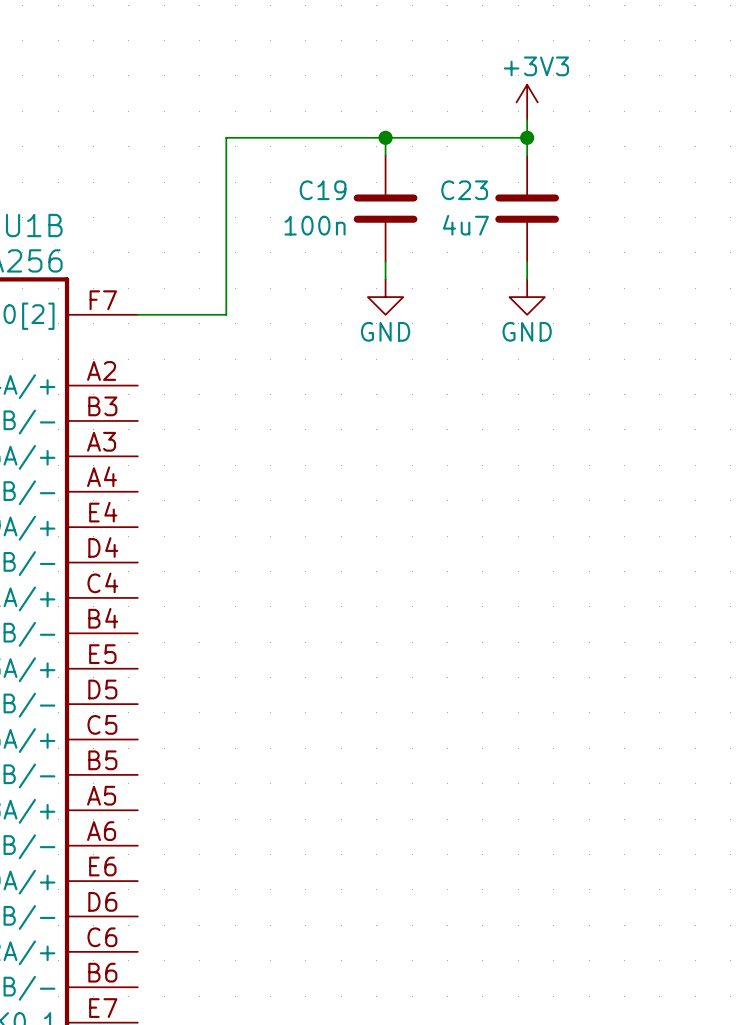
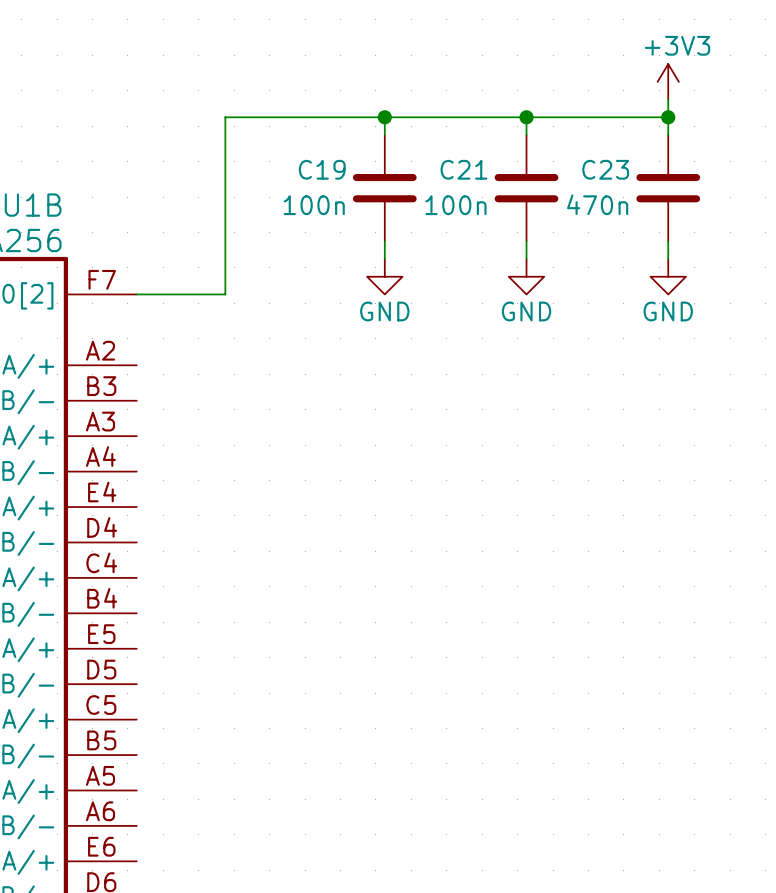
power symbol position: +3V3 (527, 102) -> +3V3 (668, 81)
wire: (527, 120) (527, 137) -> (668, 117) (526, 117)
wire: none -> (668, 99) (668, 135)
junction: none -> (668, 117)
C23 name: C23 (464, 190) -> C21 (463, 169)
C23: none -> 470n (668, 188)
C23 value: 4u7 (465, 225) -> 100n (455, 205)
wire: none -> (668, 241) (668, 259)
power symbol: none -> GND (668, 276)

